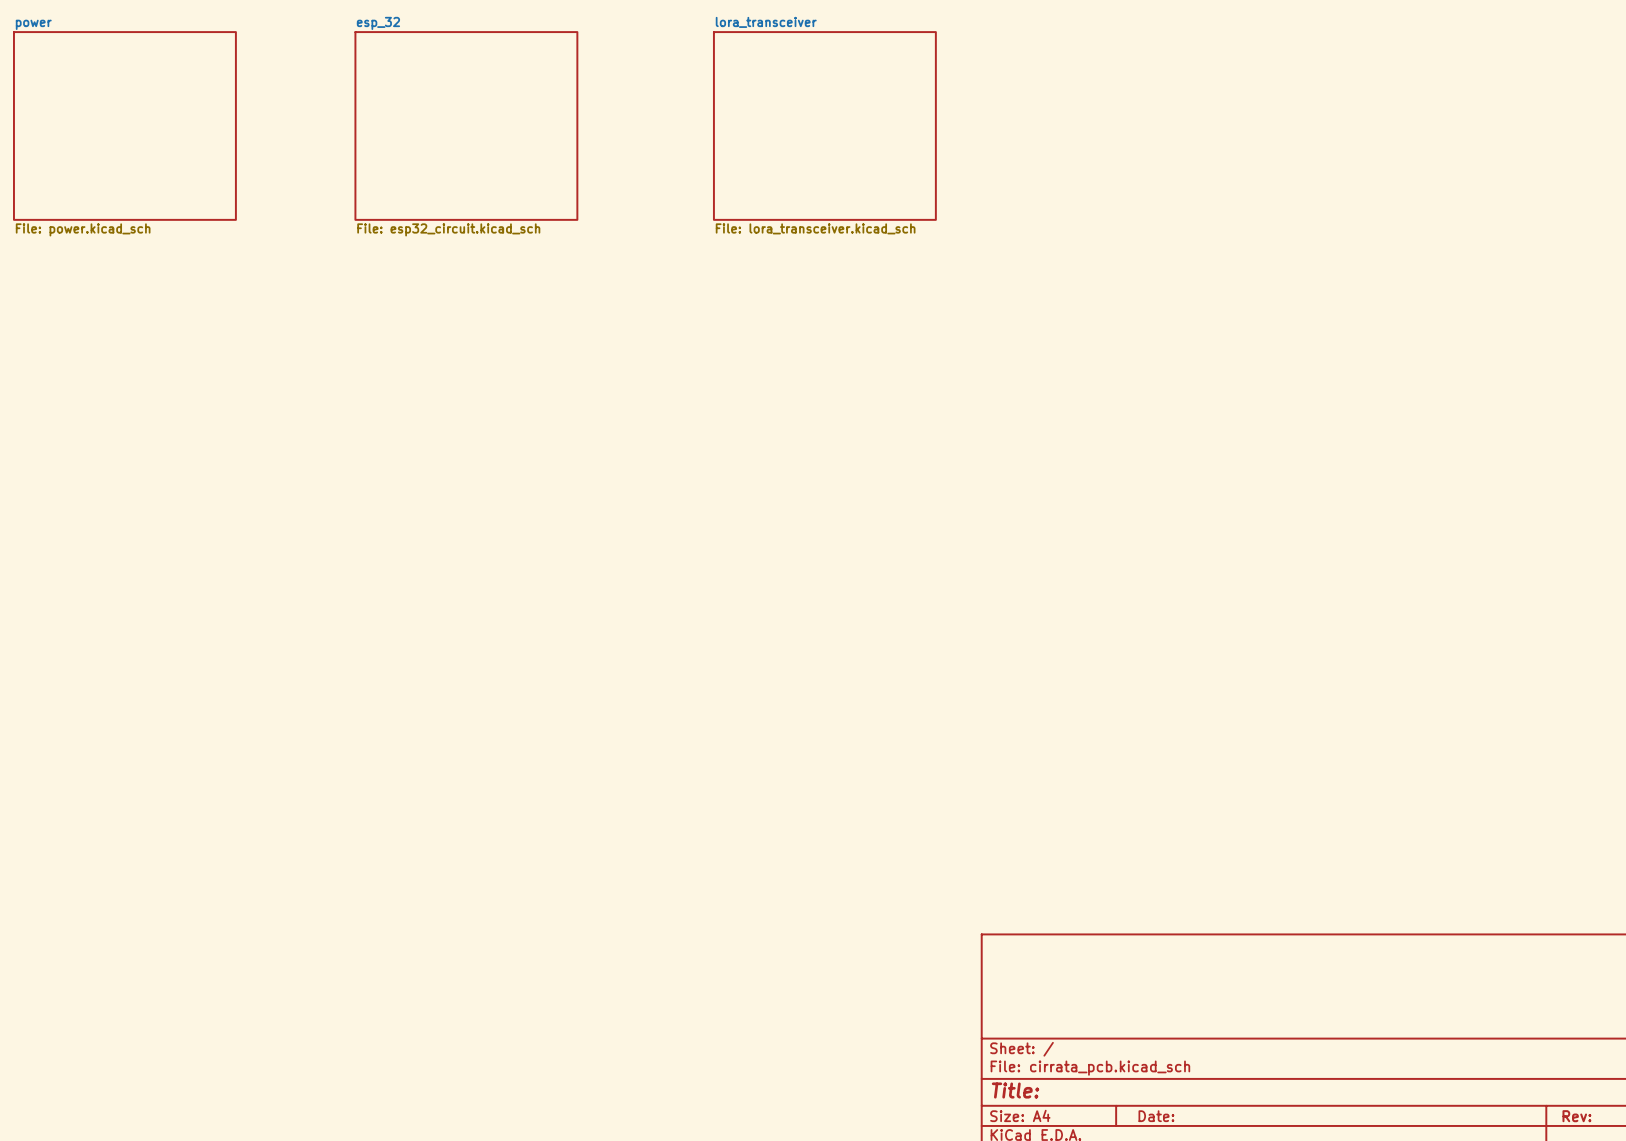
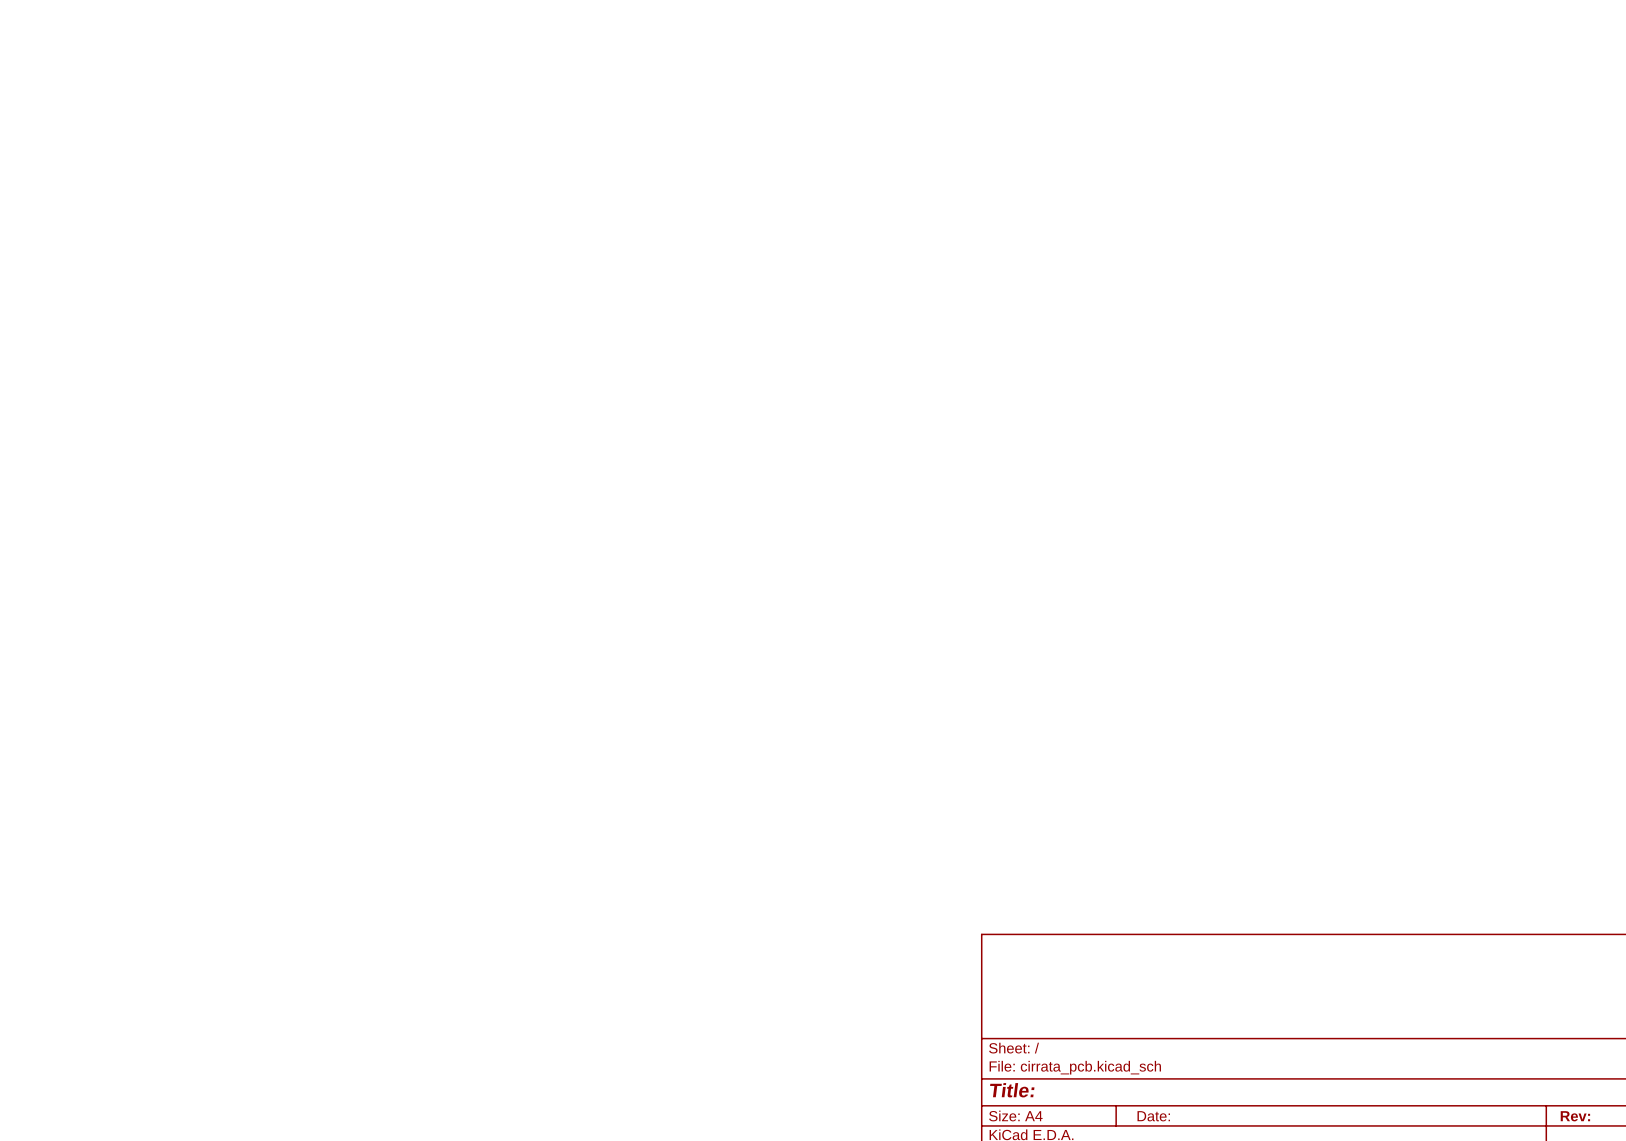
sheet power: File: power.kicad_sch (124, 125) -> none
sheet esp_32: File: esp32_circuit.kicad_sch (466, 125) -> none
sheet lora_transceiver: File: lora_transceiver.kicad_sch (824, 125) -> none

